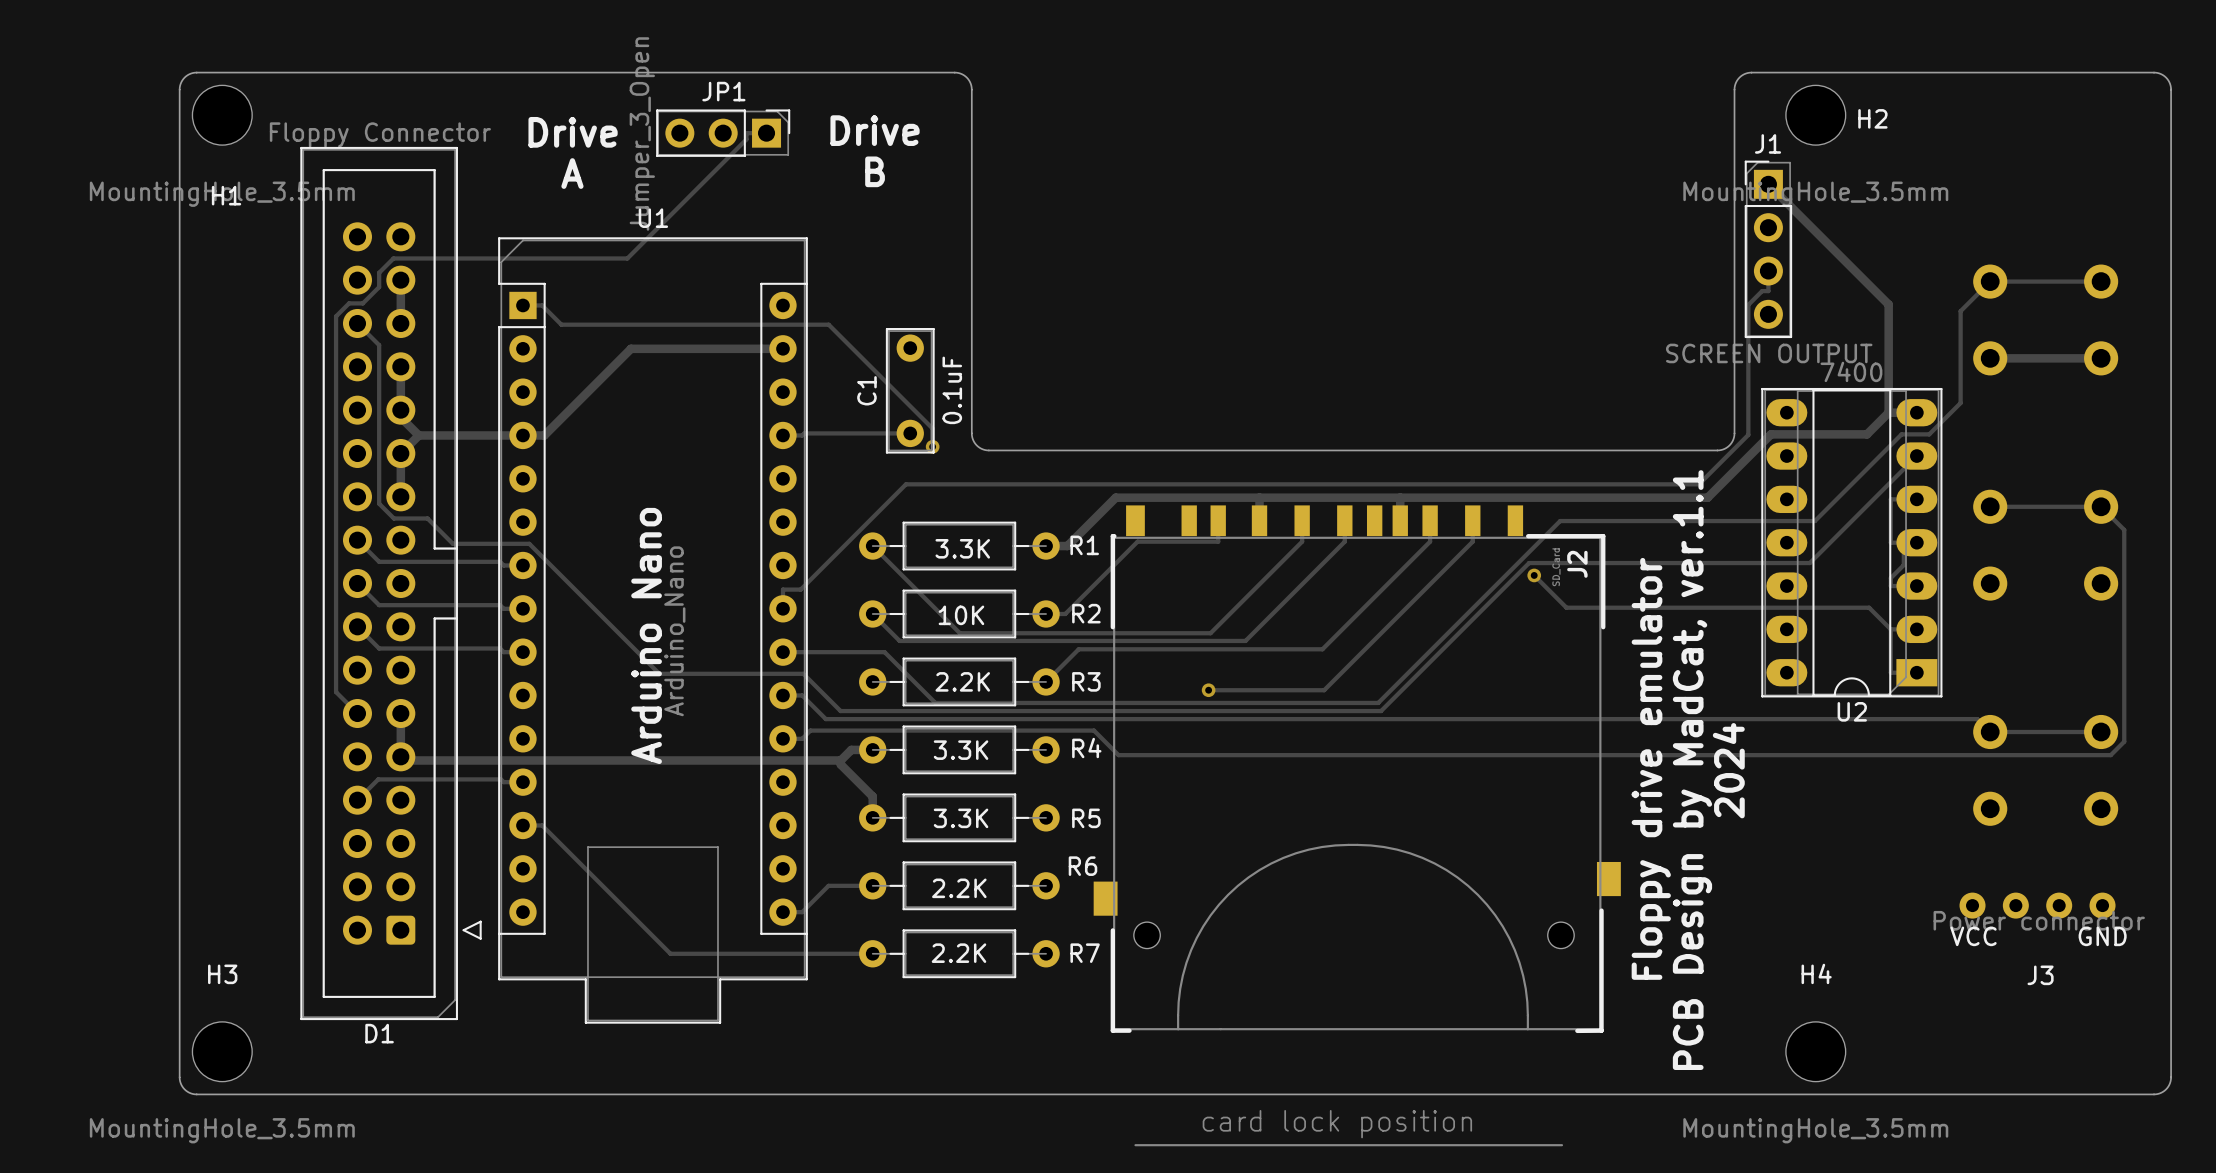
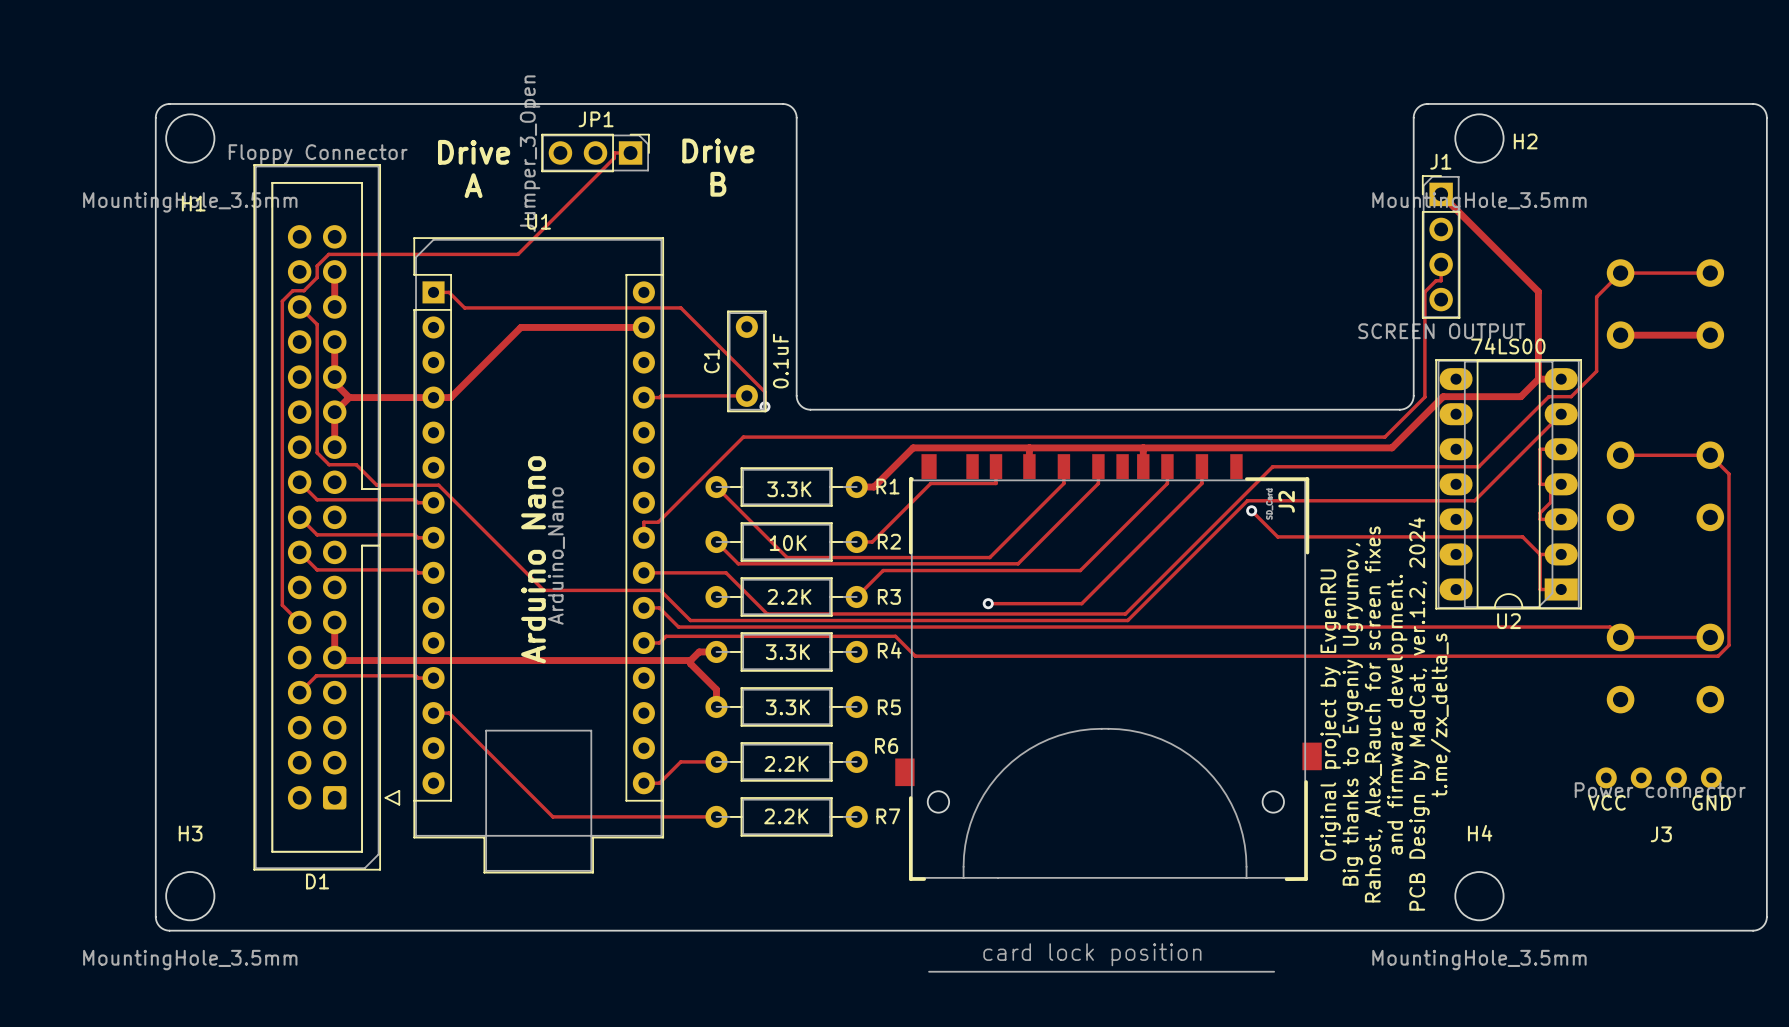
U2 value: 7400 (1851, 371) -> 74LS00 (1508, 346)
text: Floppy drive emulator (1651, 768) -> none
text: PCB Design by MadCat, ver.1.1 (1692, 770) -> none
text: 2024 (1728, 770) -> none
text: none -> PCB Design by MadCat, ver.1.2, 2024 (1419, 714)
text: none -> Original project by EvgenRU (1330, 715)
text: none -> Big thanks to Evgeniy Ugryumov, (1352, 714)
text: none -> Rahost, Alex_Rauch for screen fixes (1373, 714)
text: none -> and firmware development. (1397, 714)
text: none -> t.me/zx_delta_s (1440, 715)

